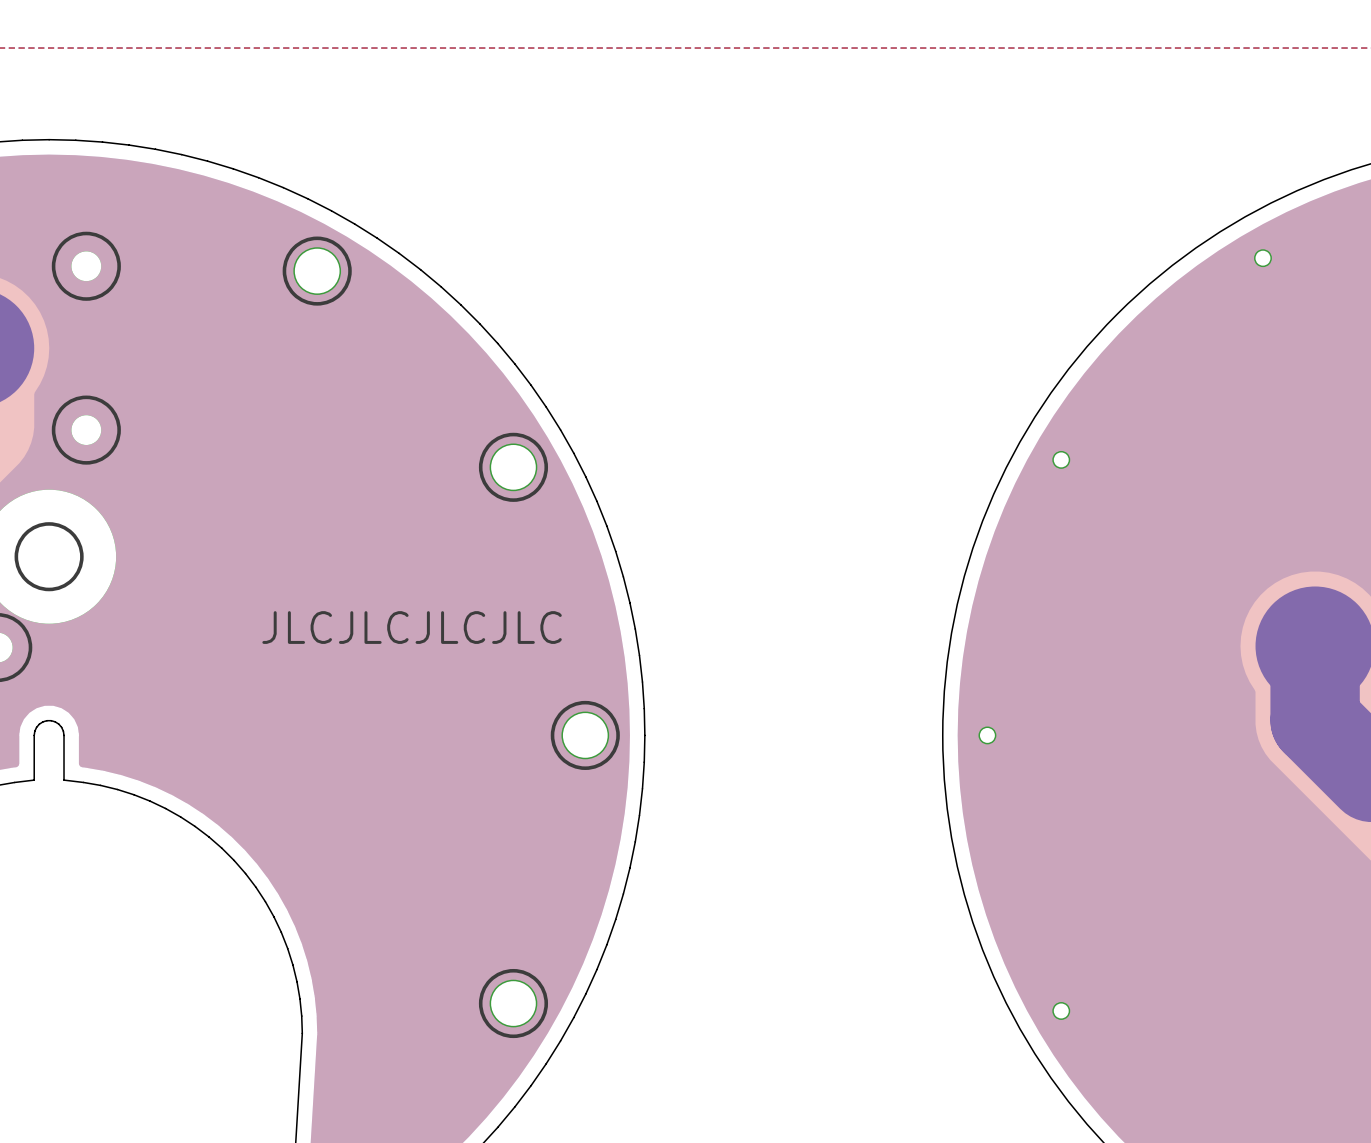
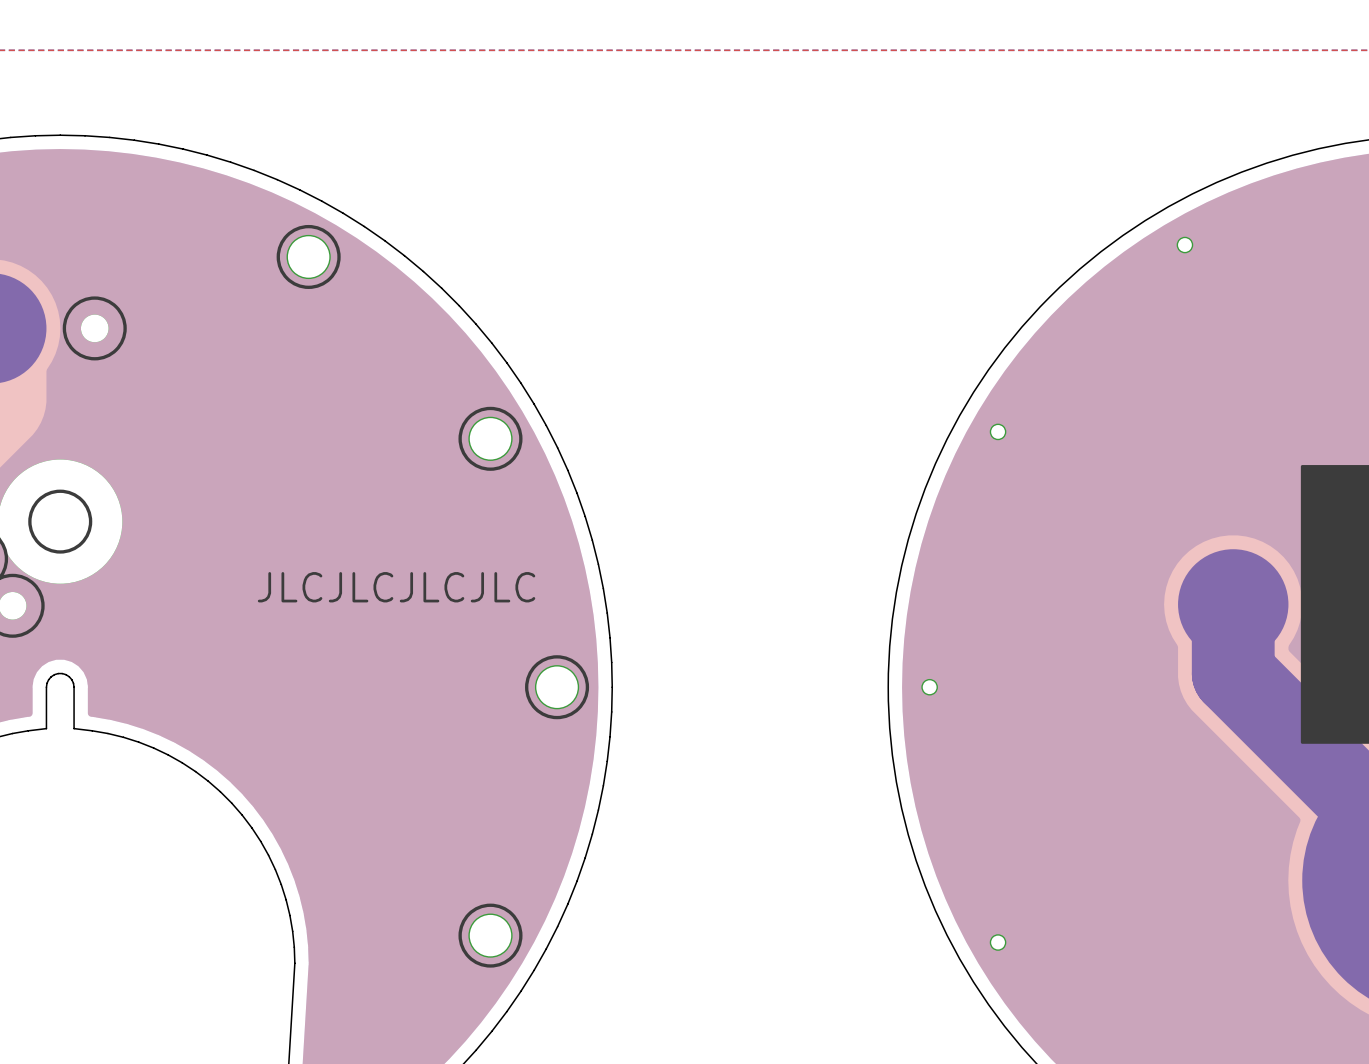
part: (86, 266) -> none
part: none -> (94, 328)
part: (86, 430) -> none

